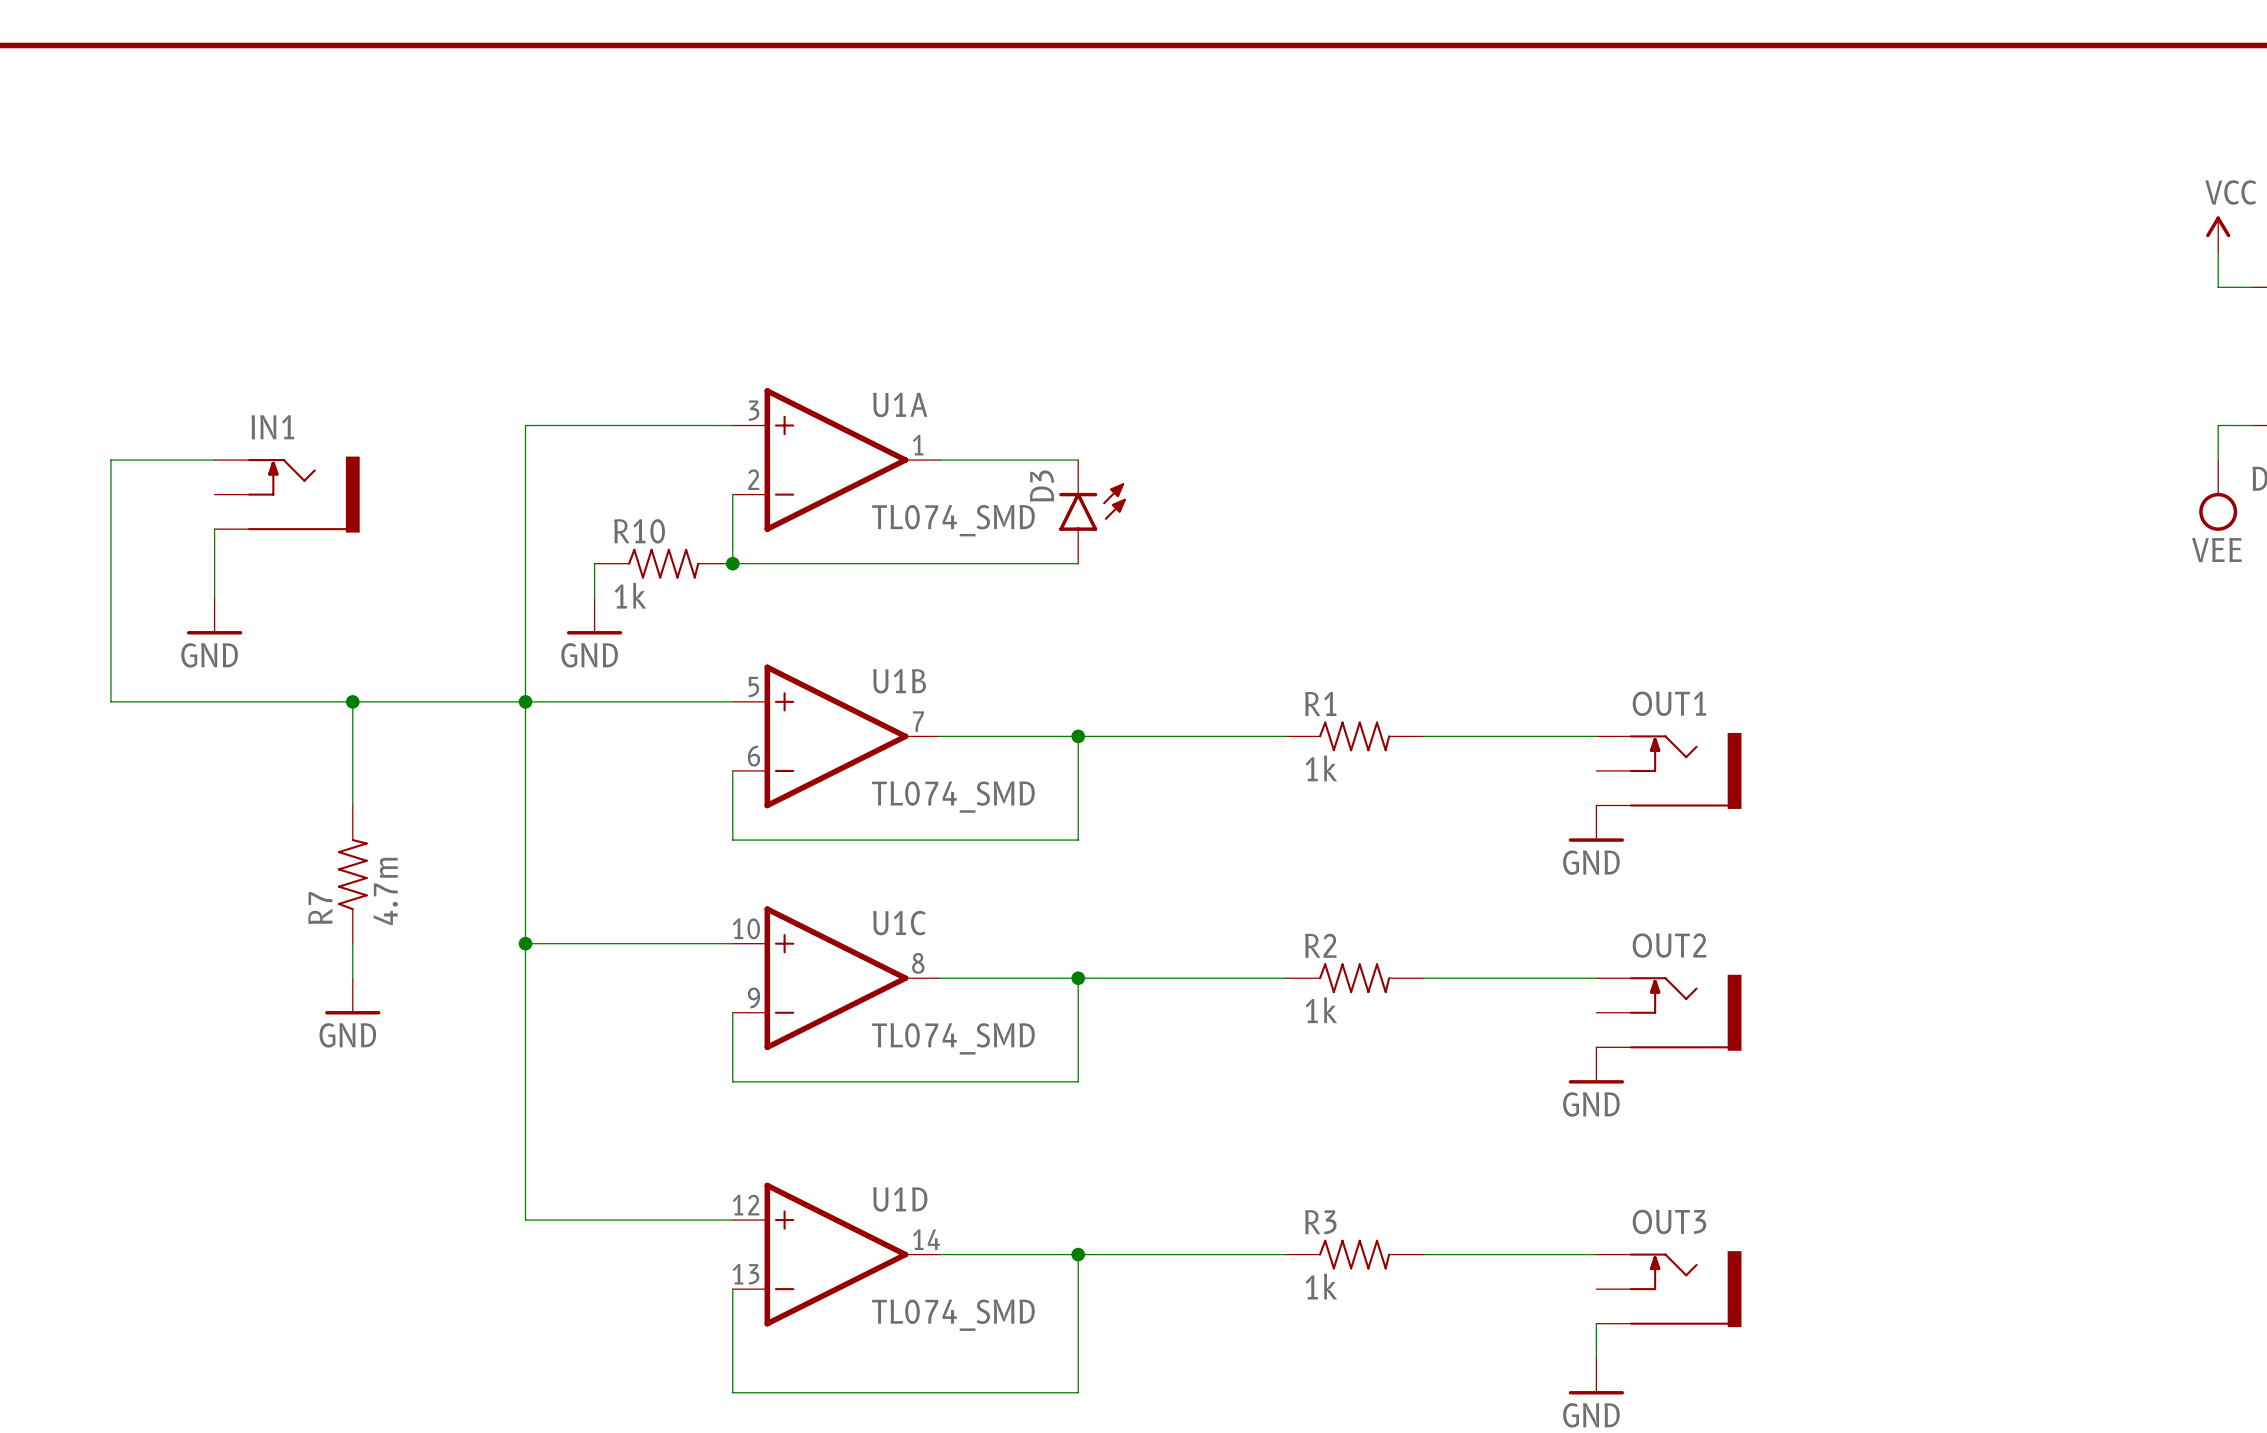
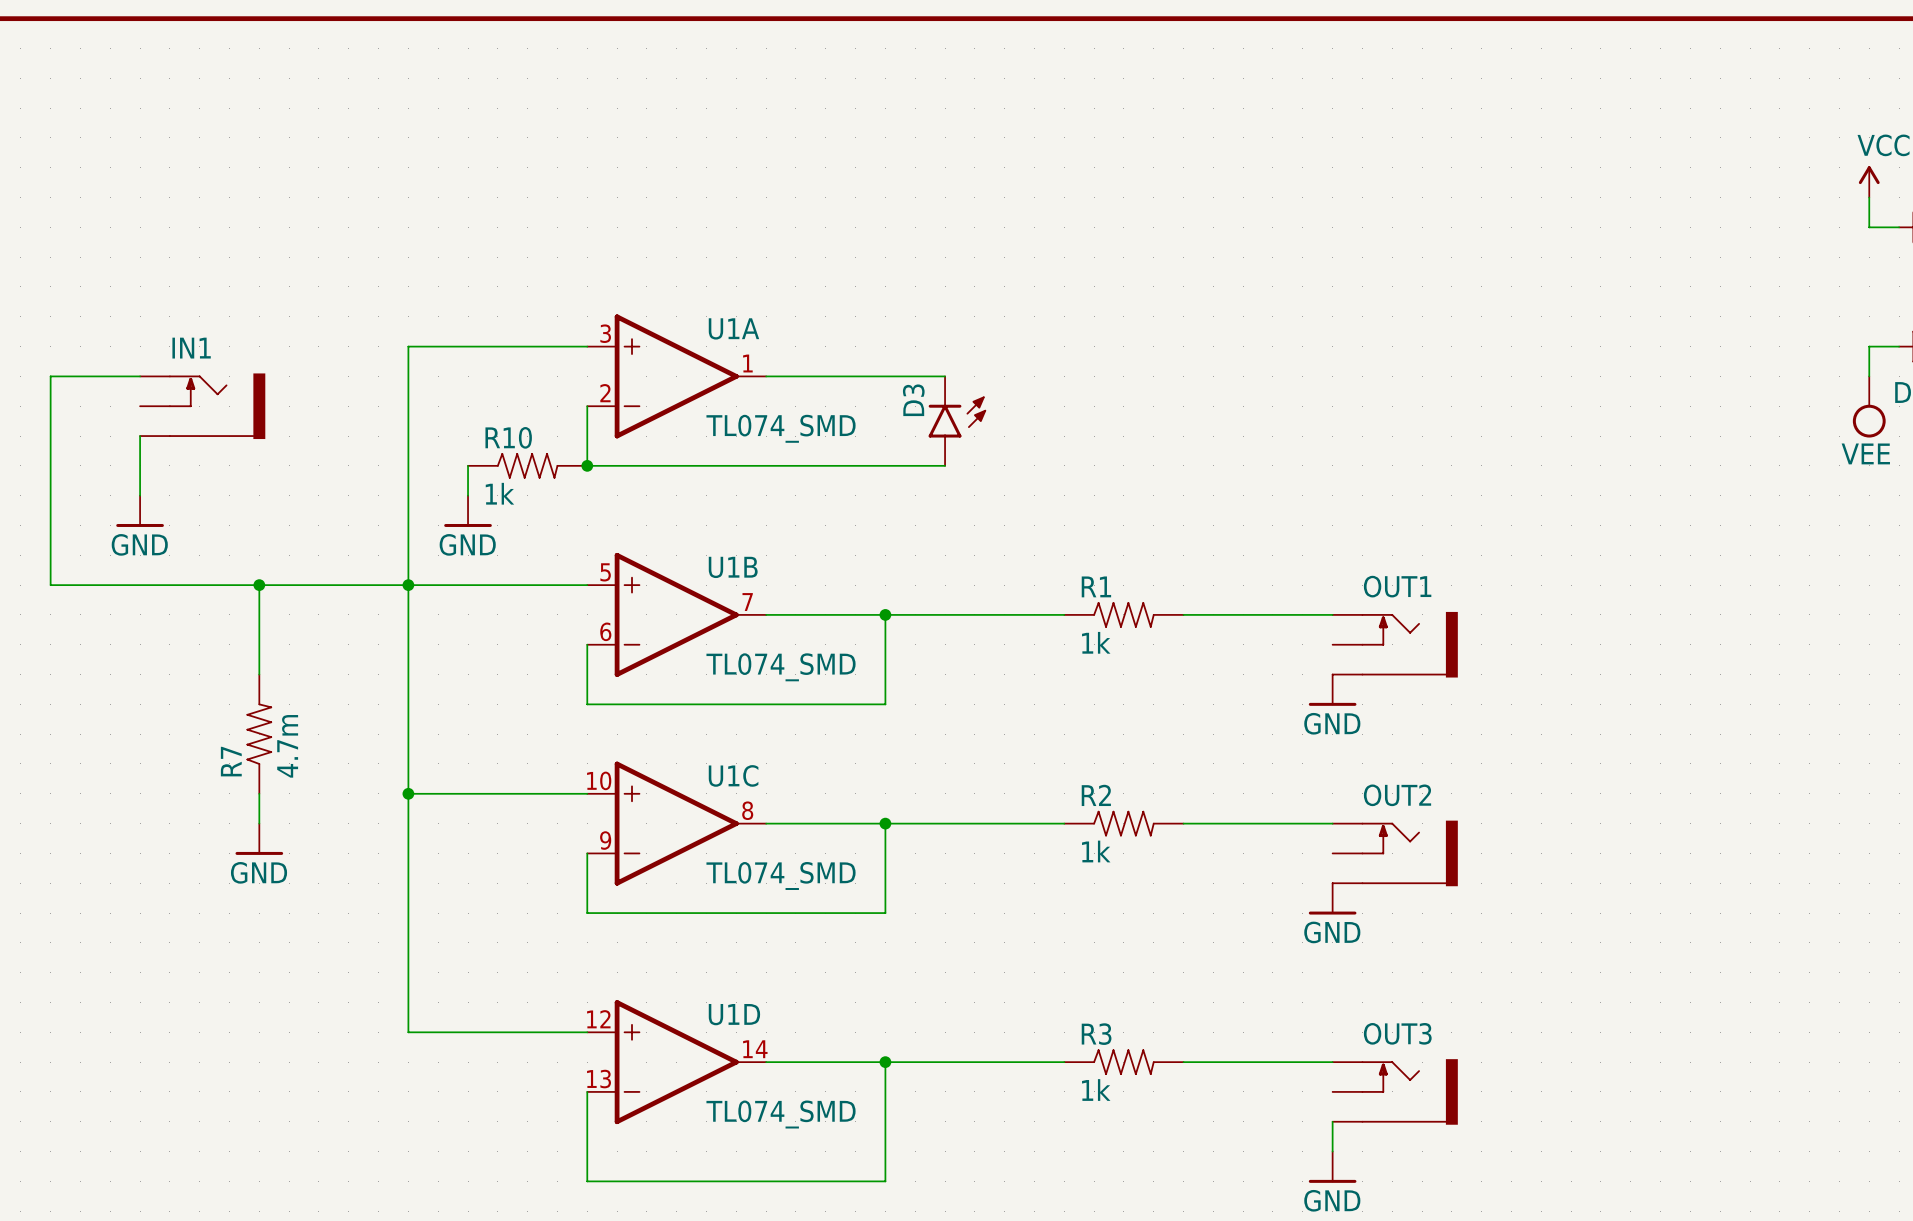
wire: none -> (885, 376) (945, 376)
D3 position: (1092, 511) -> (957, 421)
wire: none -> (885, 465) (945, 465)

